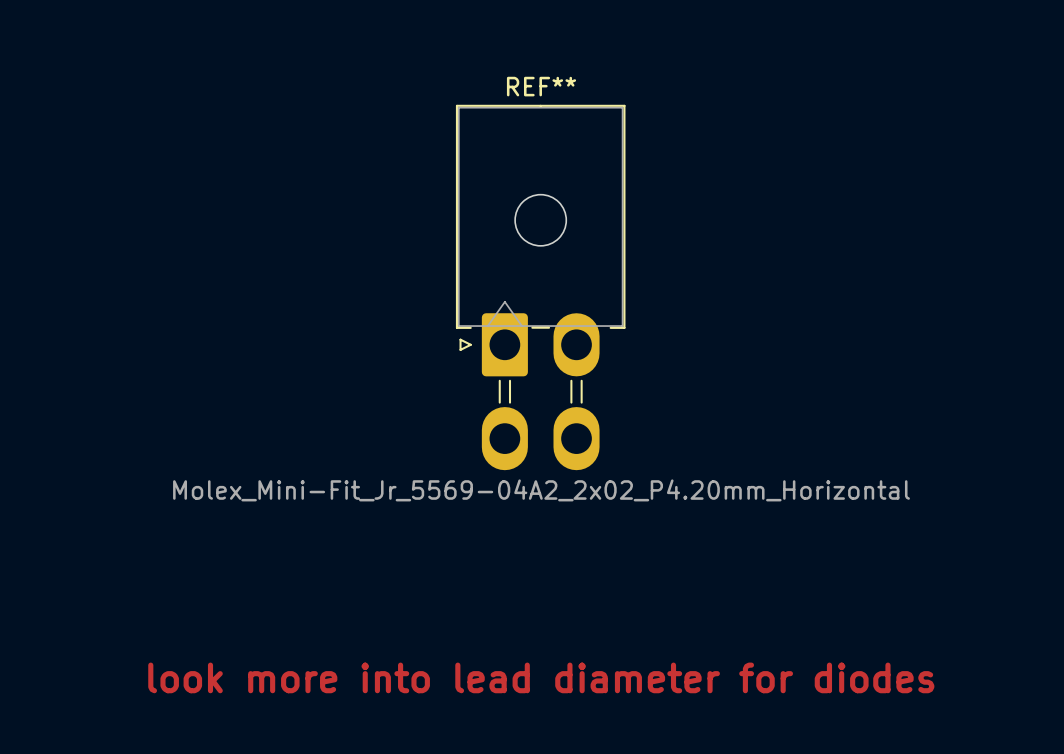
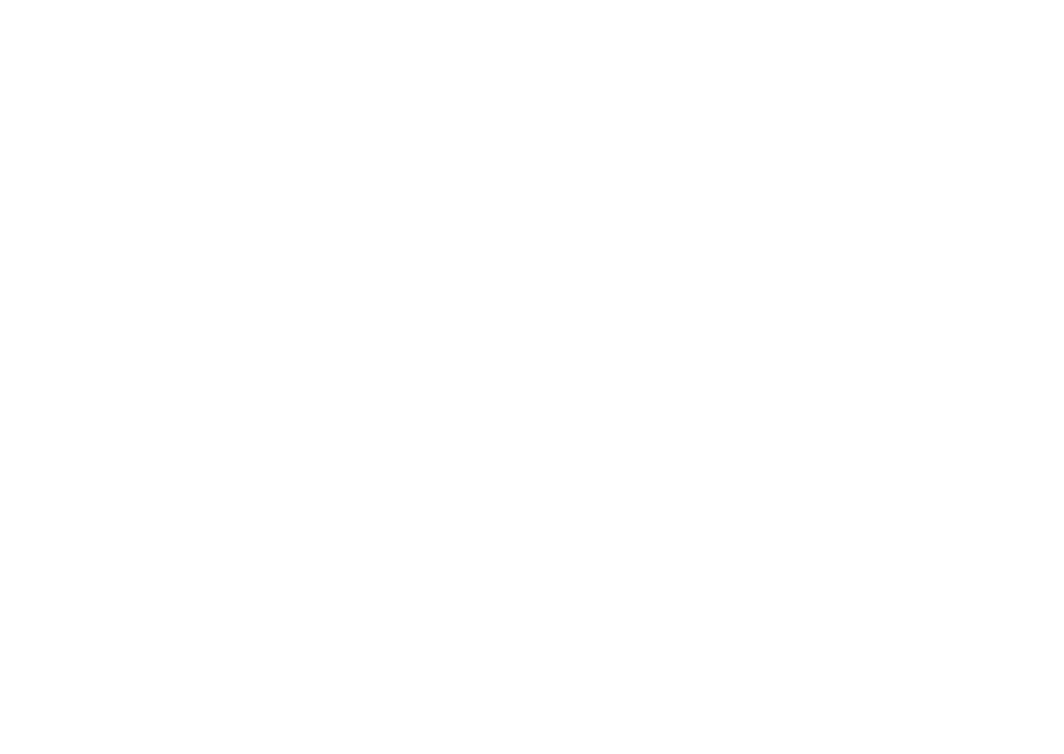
REF**: Molex_Mini-Fit_Jr_5569-04A2_2x02_P4.20mm_Horizontal (540, 287) -> none
text: look more into lead diameter for diodes (541, 677) -> none

